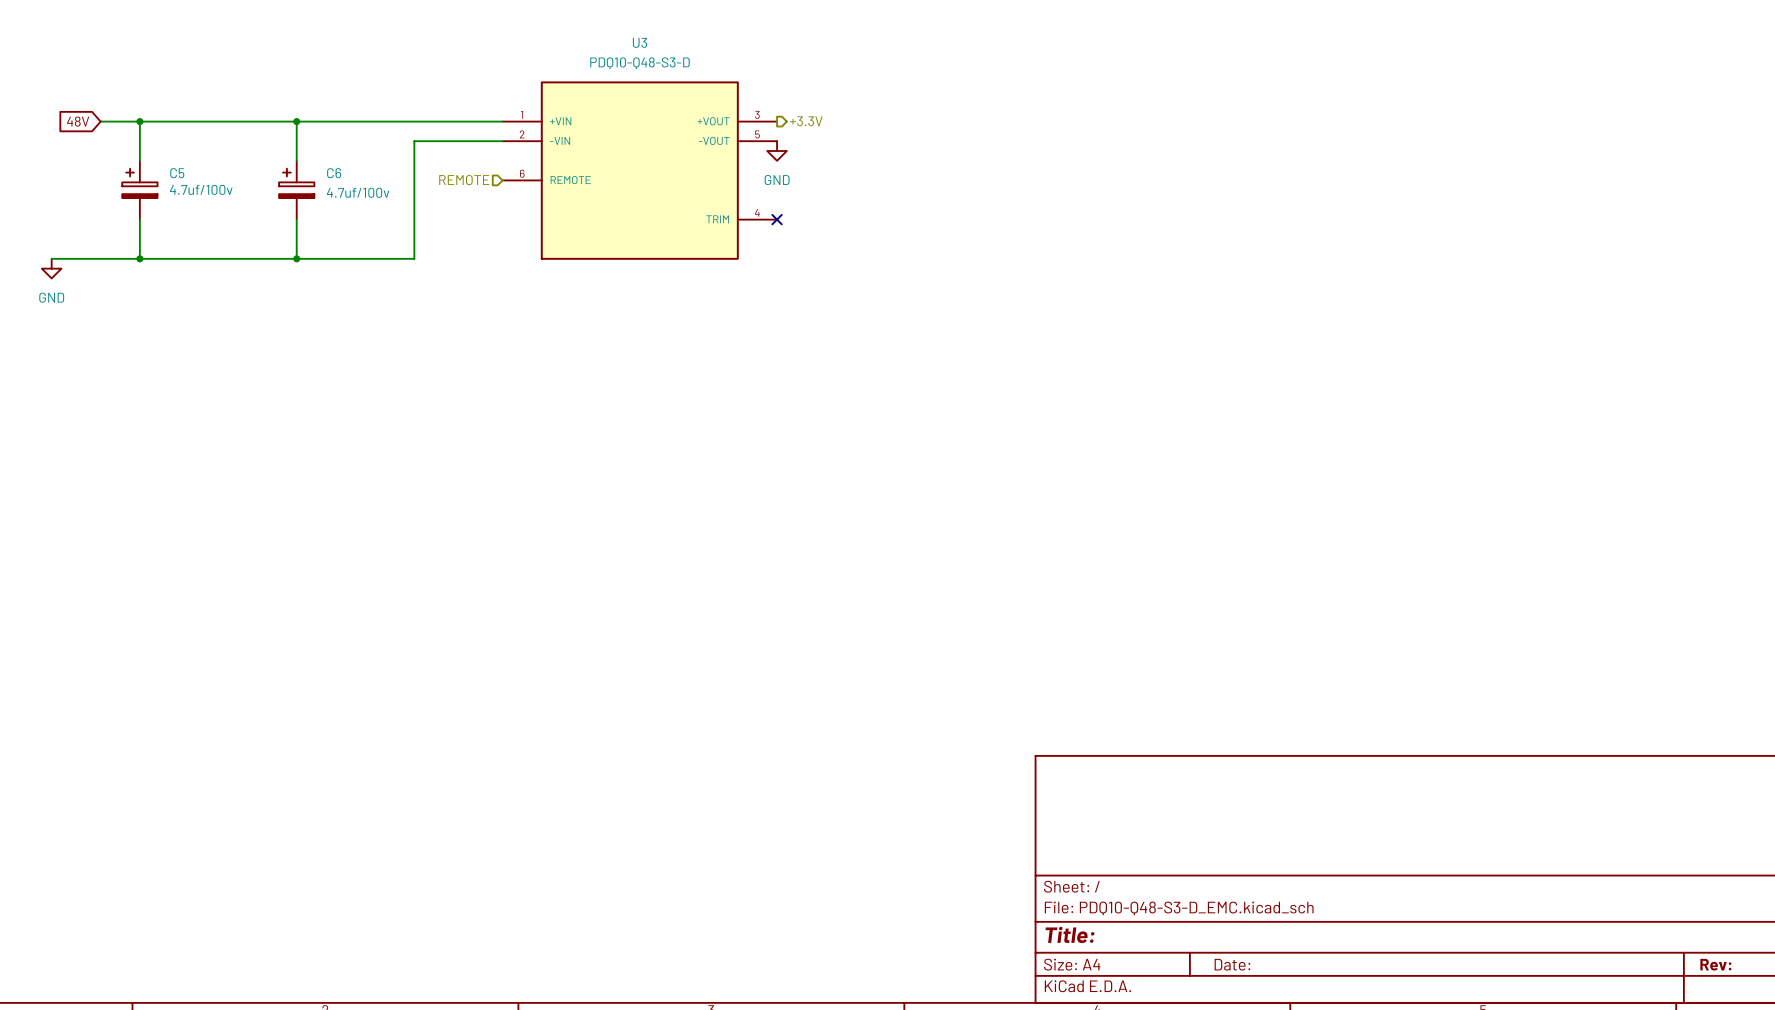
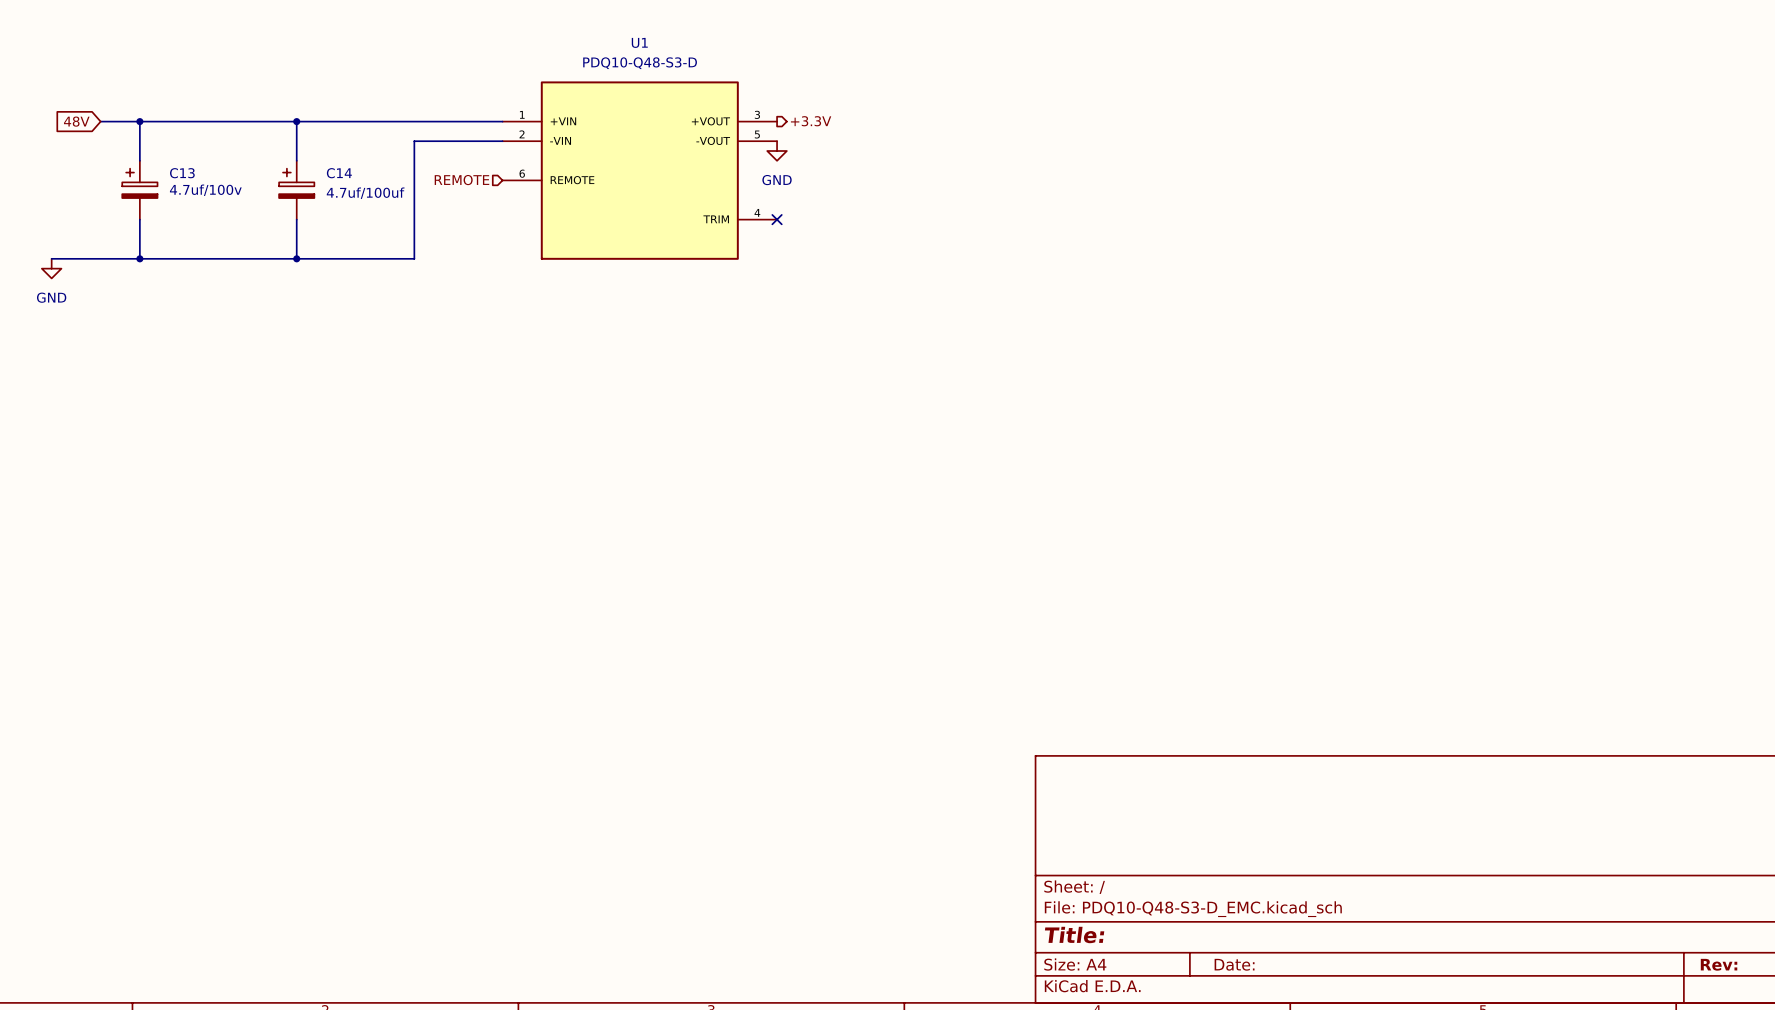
U3 name: U3 (639, 42) -> U1 (639, 42)
C5 name: C5 (177, 173) -> C13 (182, 173)
C6 name: C6 (334, 173) -> C14 (339, 173)
C6 value: 4.7uf/100v (358, 192) -> 4.7uf/100uf (365, 193)

